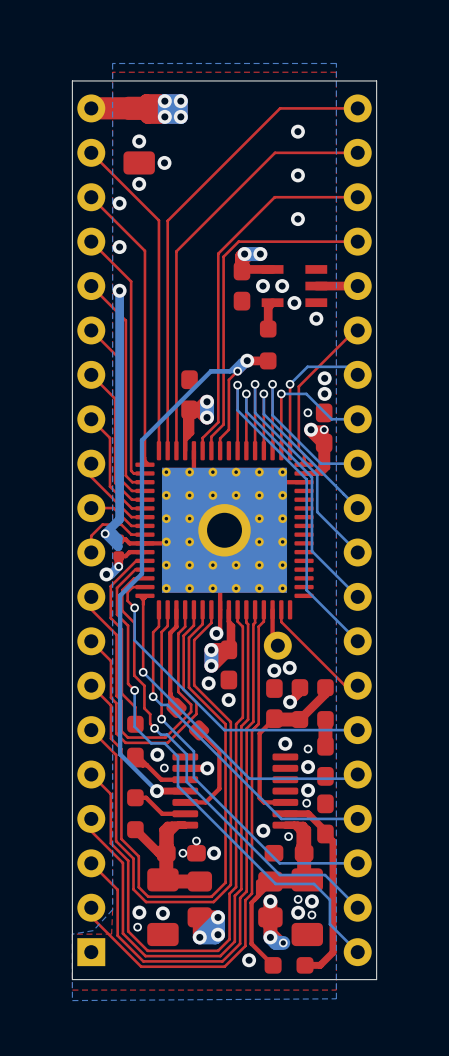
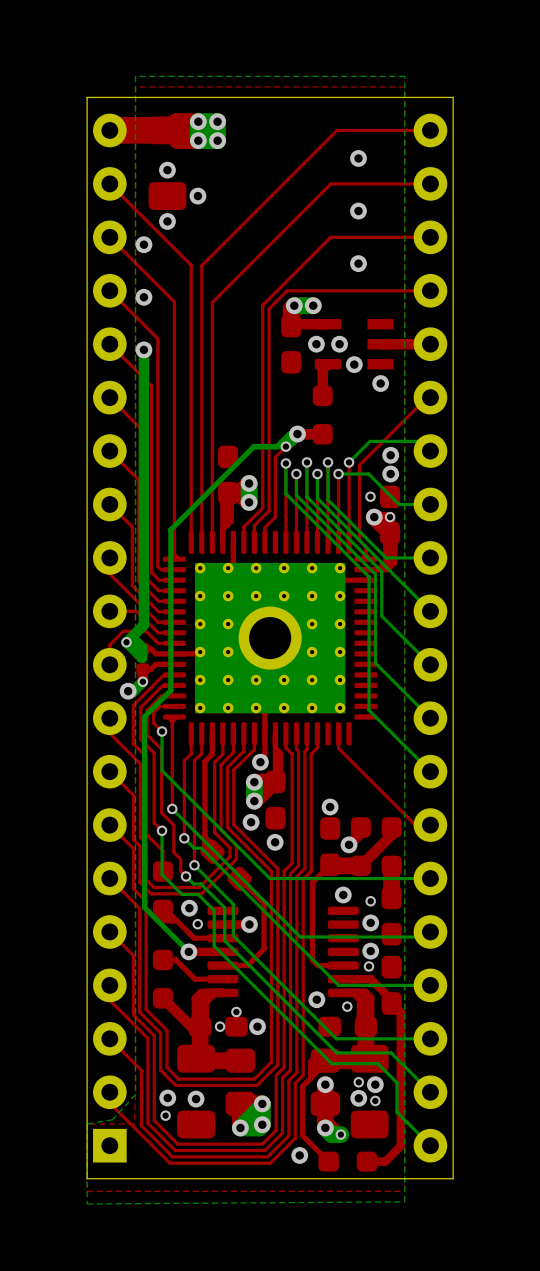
top track: (272, 609) (272, 640) (277, 645) -> none
part: (277, 645) -> none
via: (289, 667) -> none

